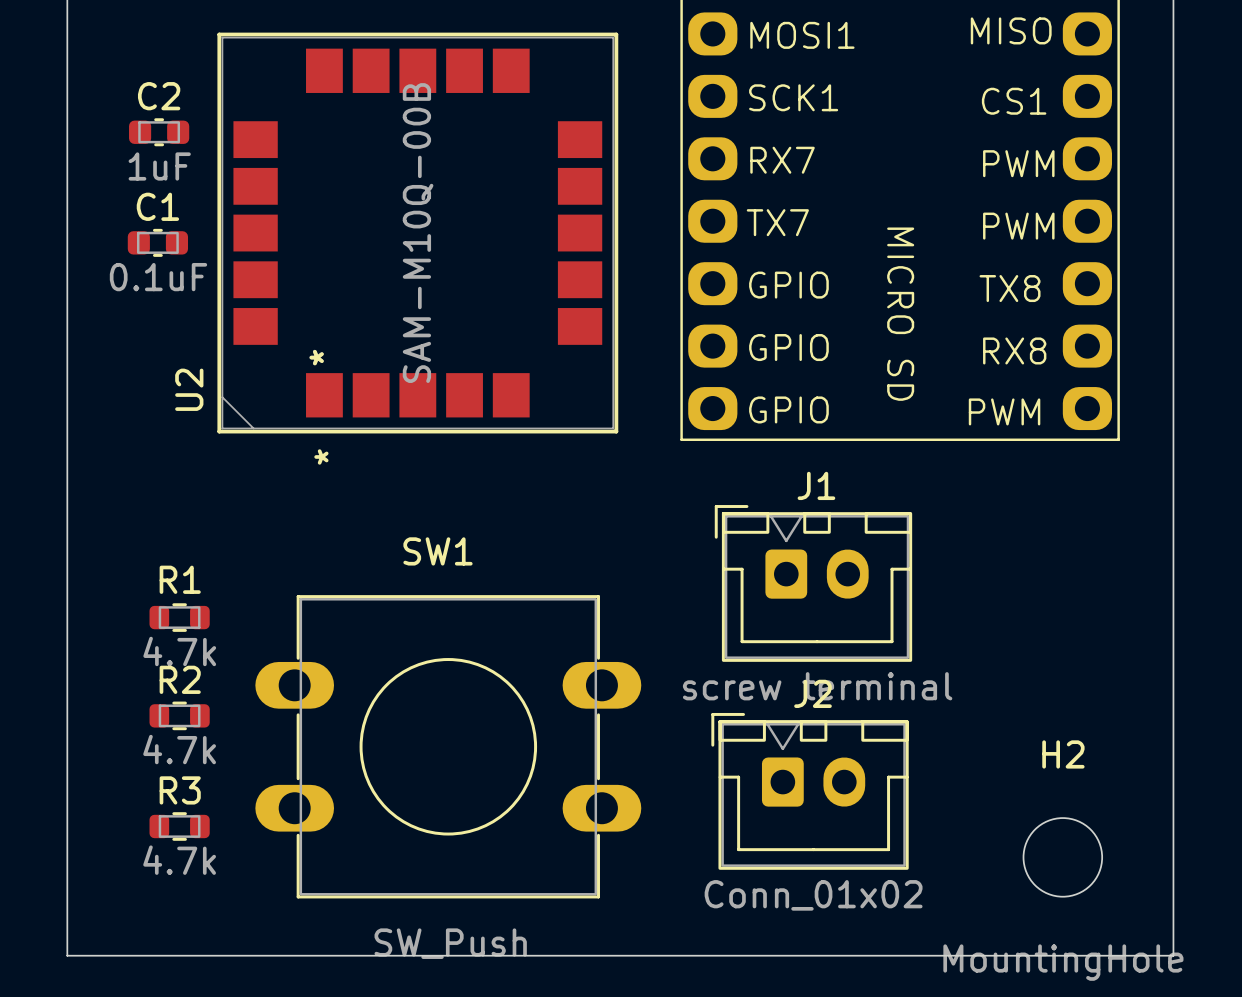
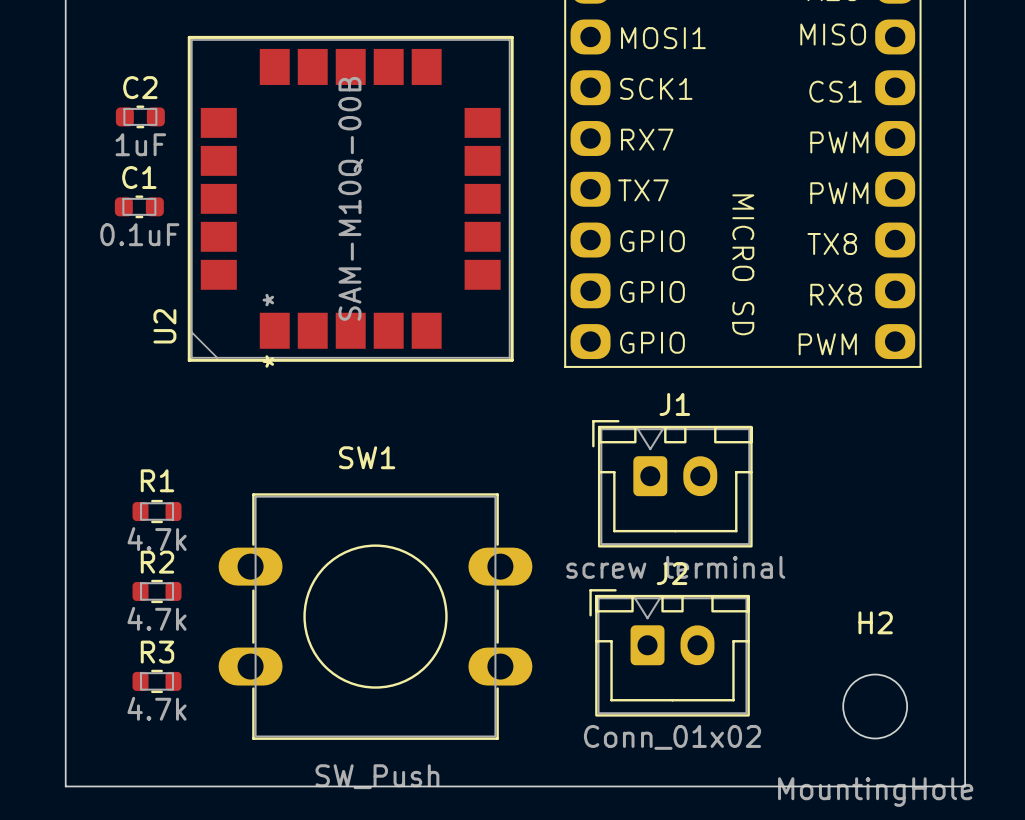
U2 footprint: [217, 32, 619, 434] -> [187, 35, 514, 362]

